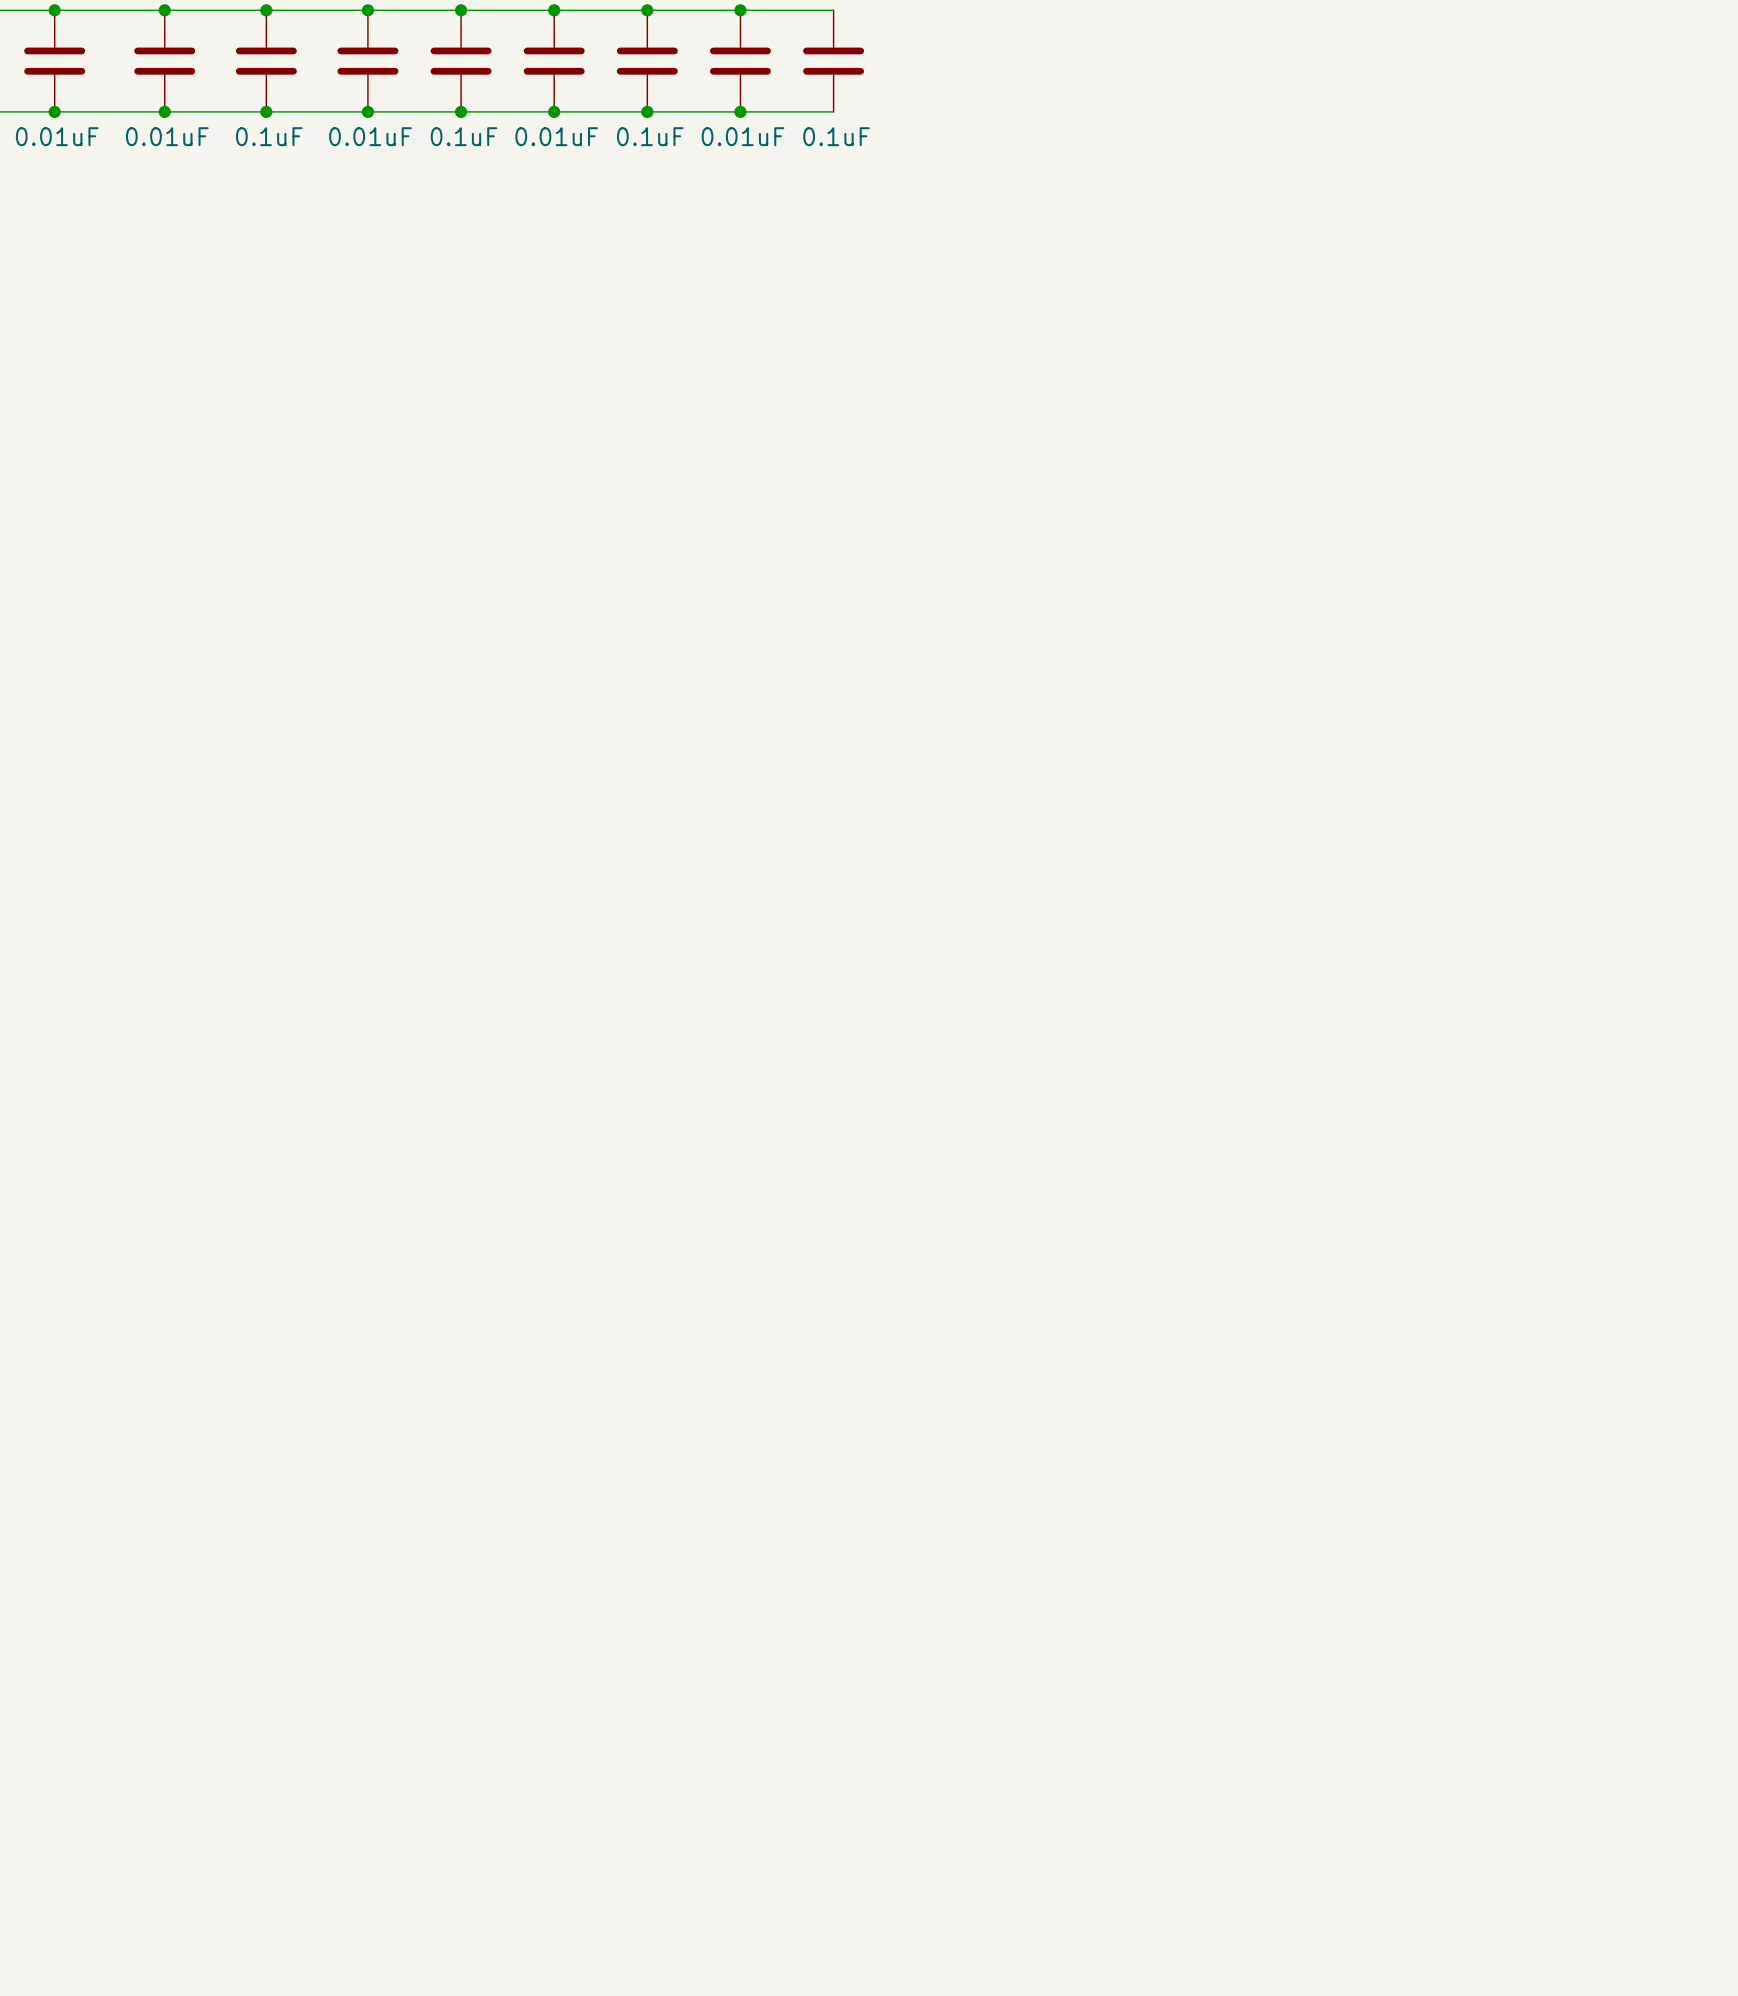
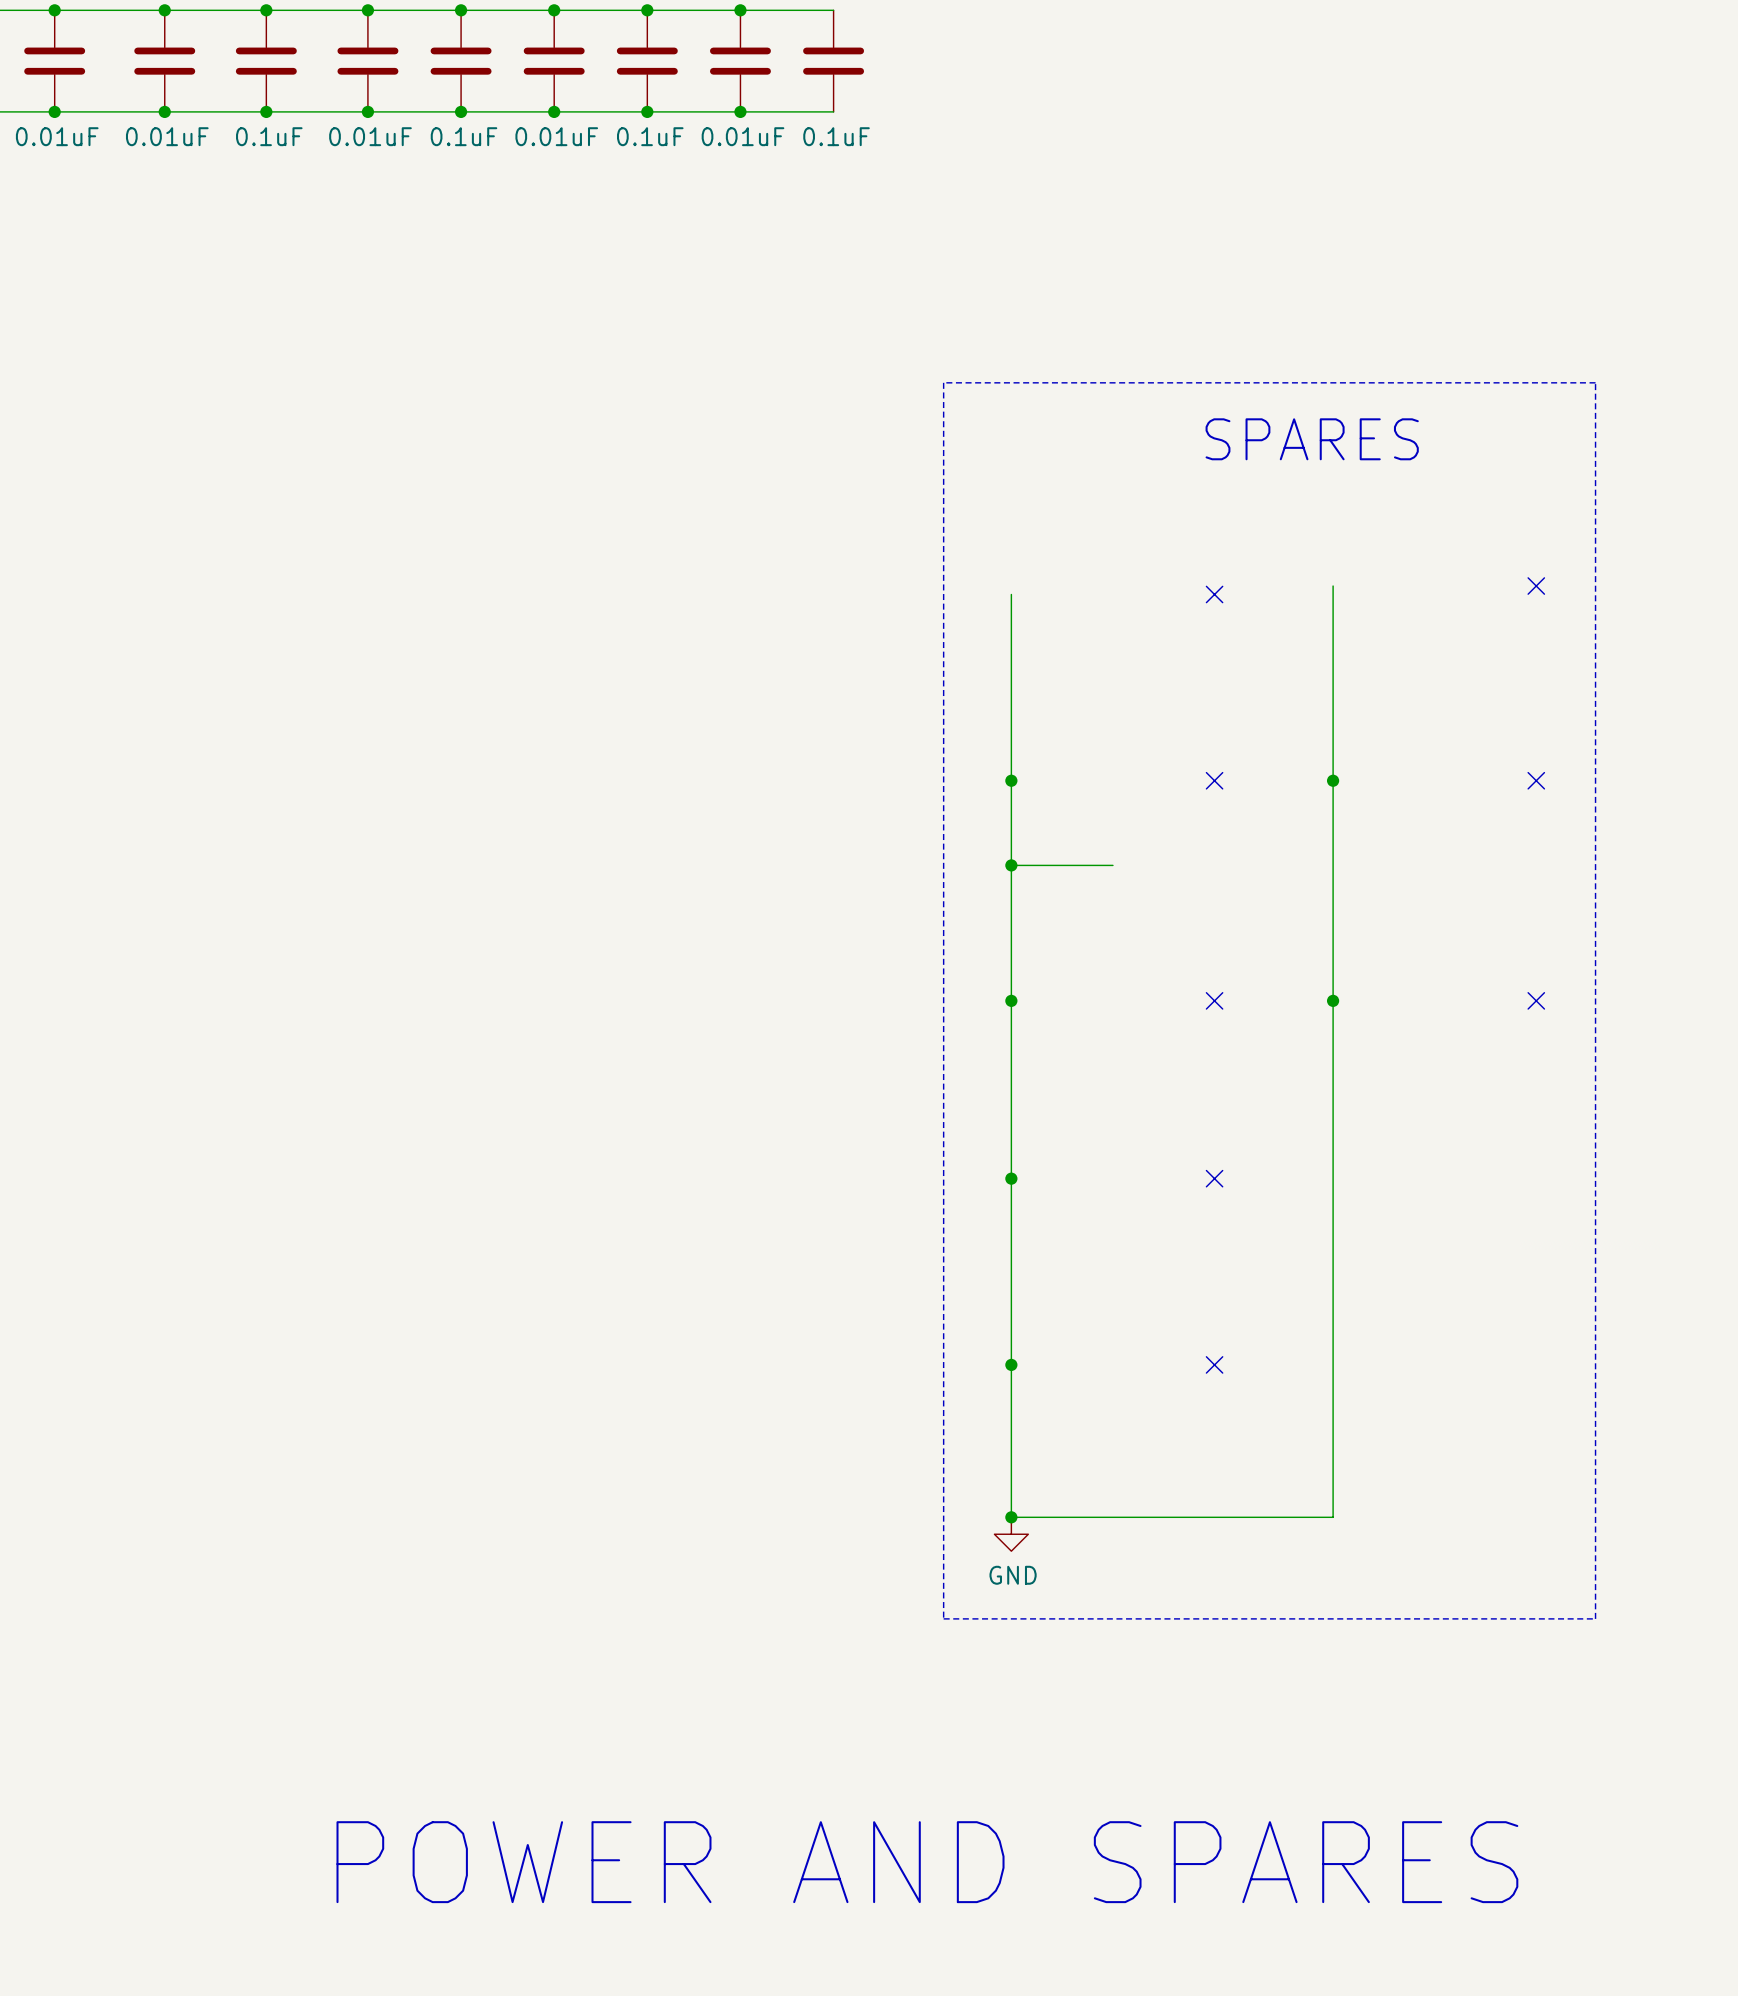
line: none -> (943, 382) (943, 1618) (1595, 1618) (1595, 382) (943, 382)
text: none -> SPARES (1312, 439)
wire: none -> (1333, 586) (1333, 1517) (1011, 1517) (1011, 594)
no-connect mark: none -> (1536, 586)
no-connect mark: none -> (1214, 594)
junction: none -> (1011, 780)
no-connect mark: none -> (1214, 780)
junction: none -> (1333, 780)
no-connect mark: none -> (1536, 780)
wire: none -> (1011, 865) (1112, 865)
junction: none -> (1011, 865)
junction: none -> (1011, 1000)
no-connect mark: none -> (1214, 1000)
junction: none -> (1333, 1000)
no-connect mark: none -> (1536, 1000)
junction: none -> (1011, 1178)
no-connect mark: none -> (1214, 1178)
junction: none -> (1011, 1364)
no-connect mark: none -> (1214, 1364)
junction: none -> (1011, 1517)
power symbol: none -> GND (1011, 1534)
text: none -> POWER AND SPARES (927, 1862)

